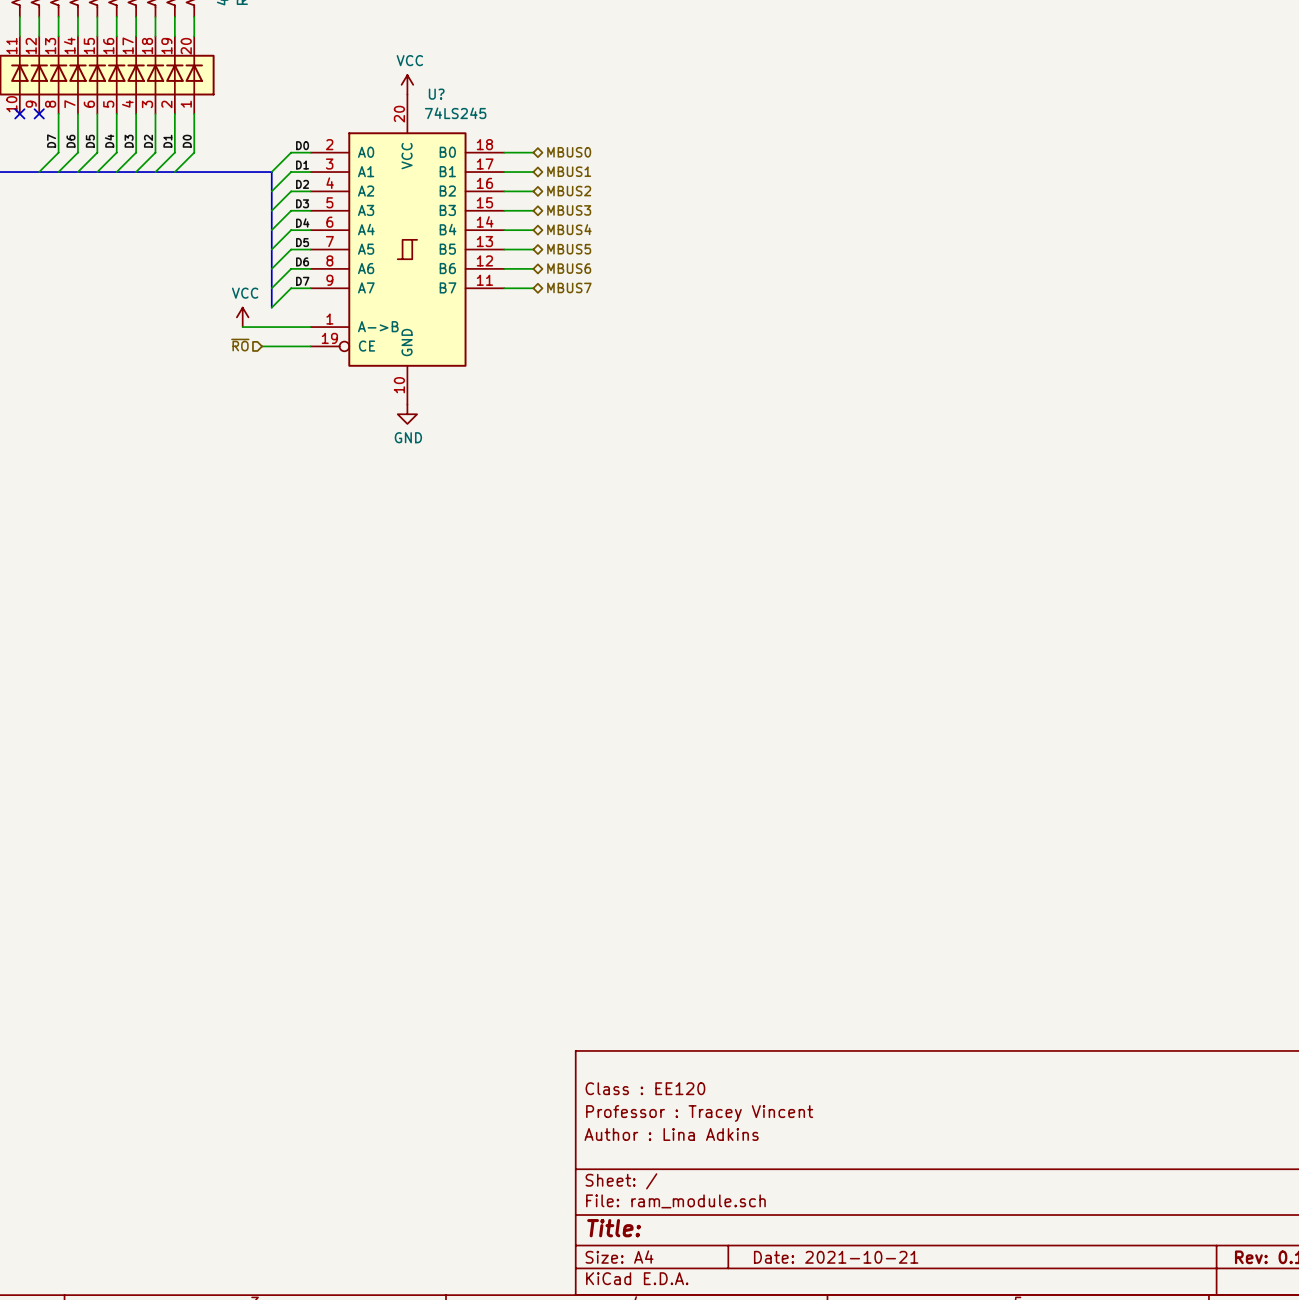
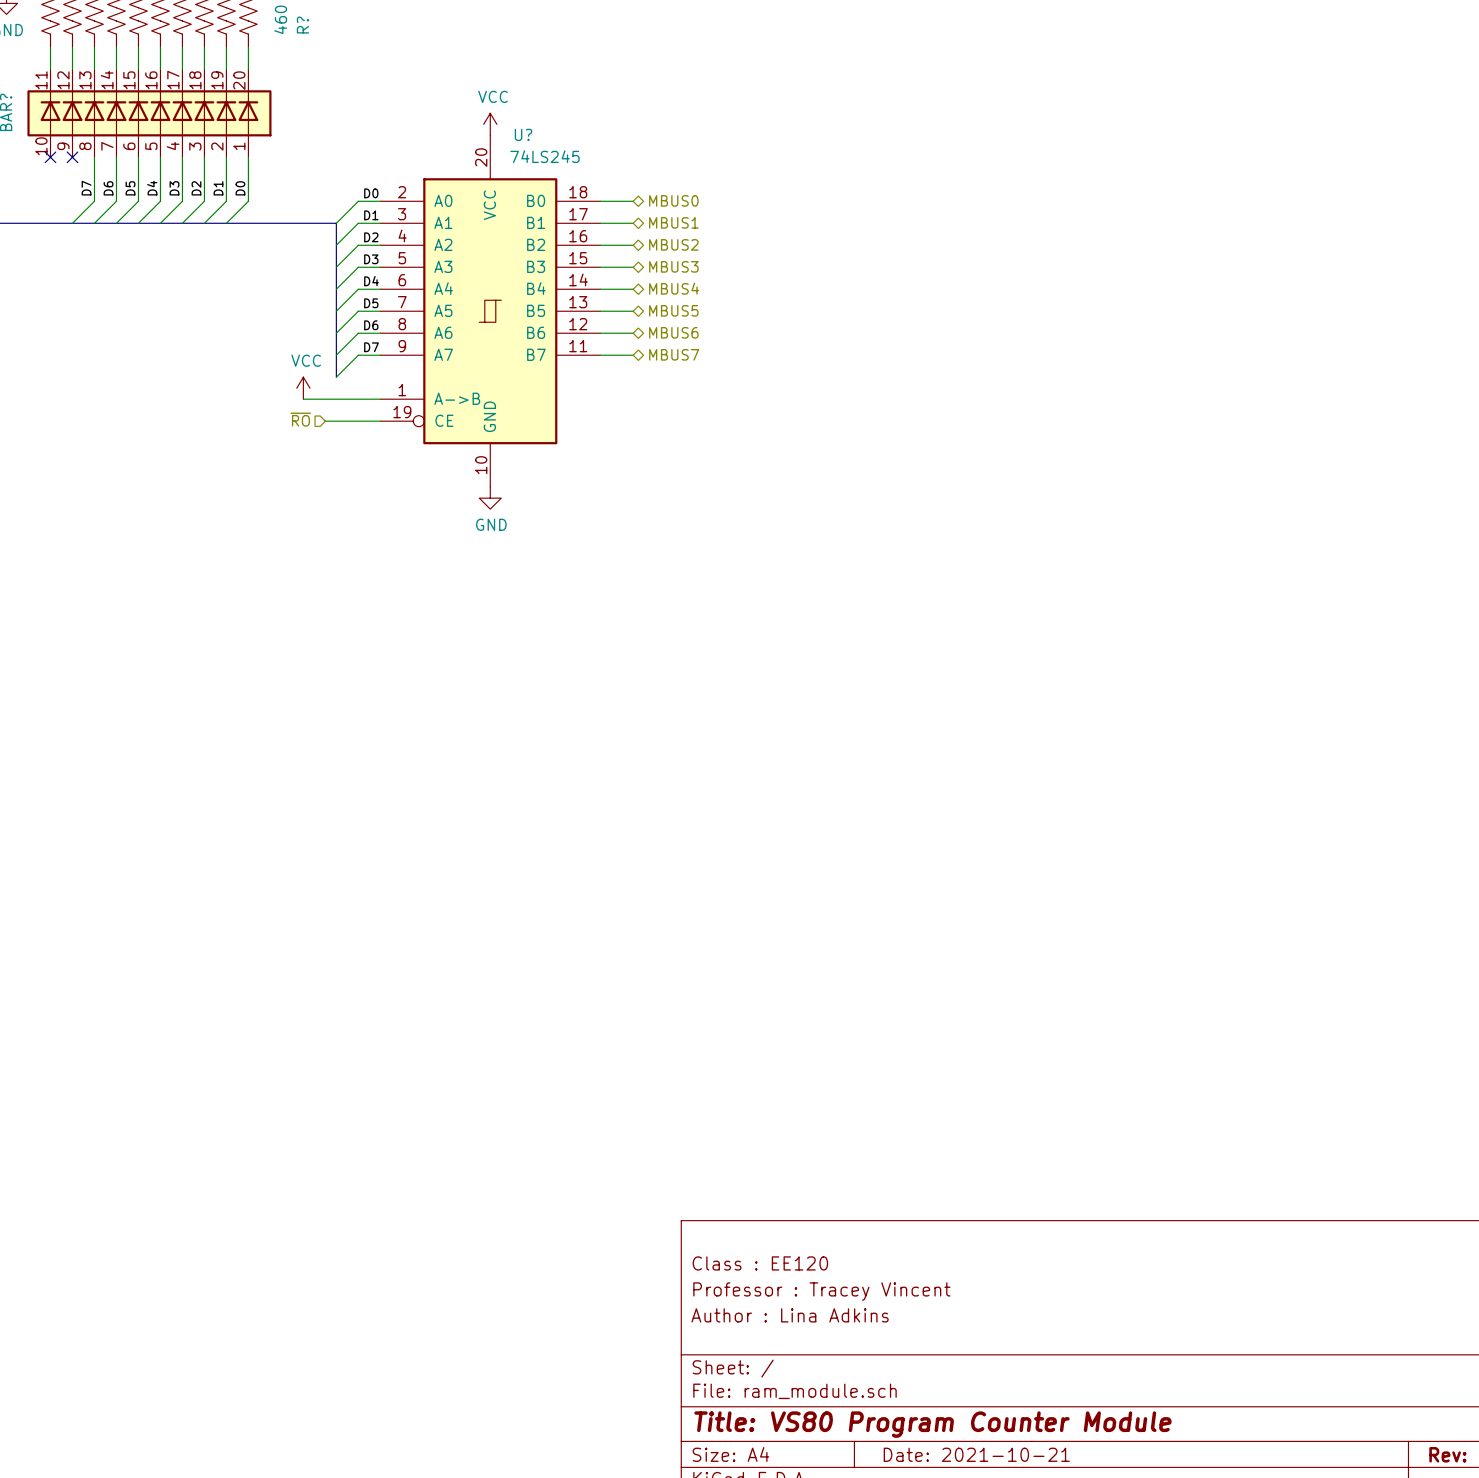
title block: Title: (614, 1228) -> Title: VS80 Program Counter Module (932, 1424)

